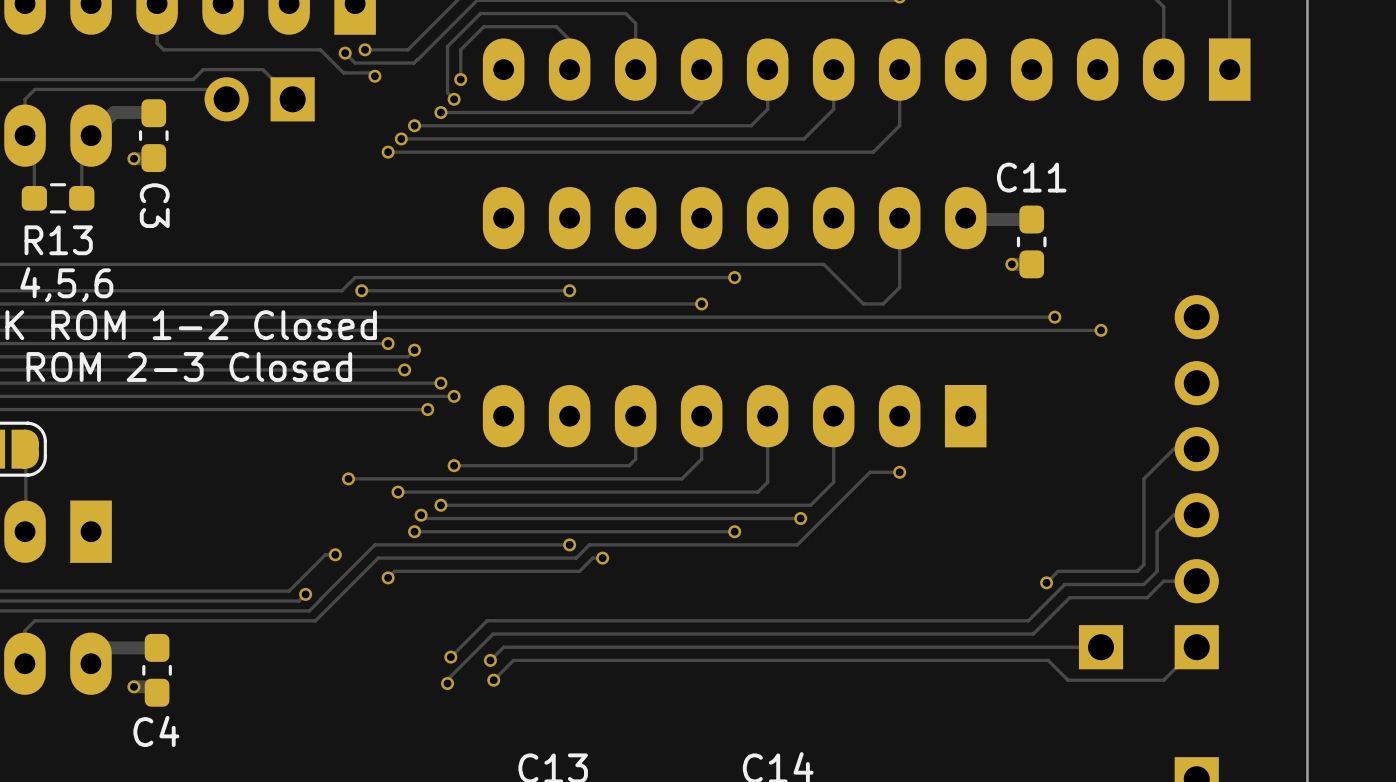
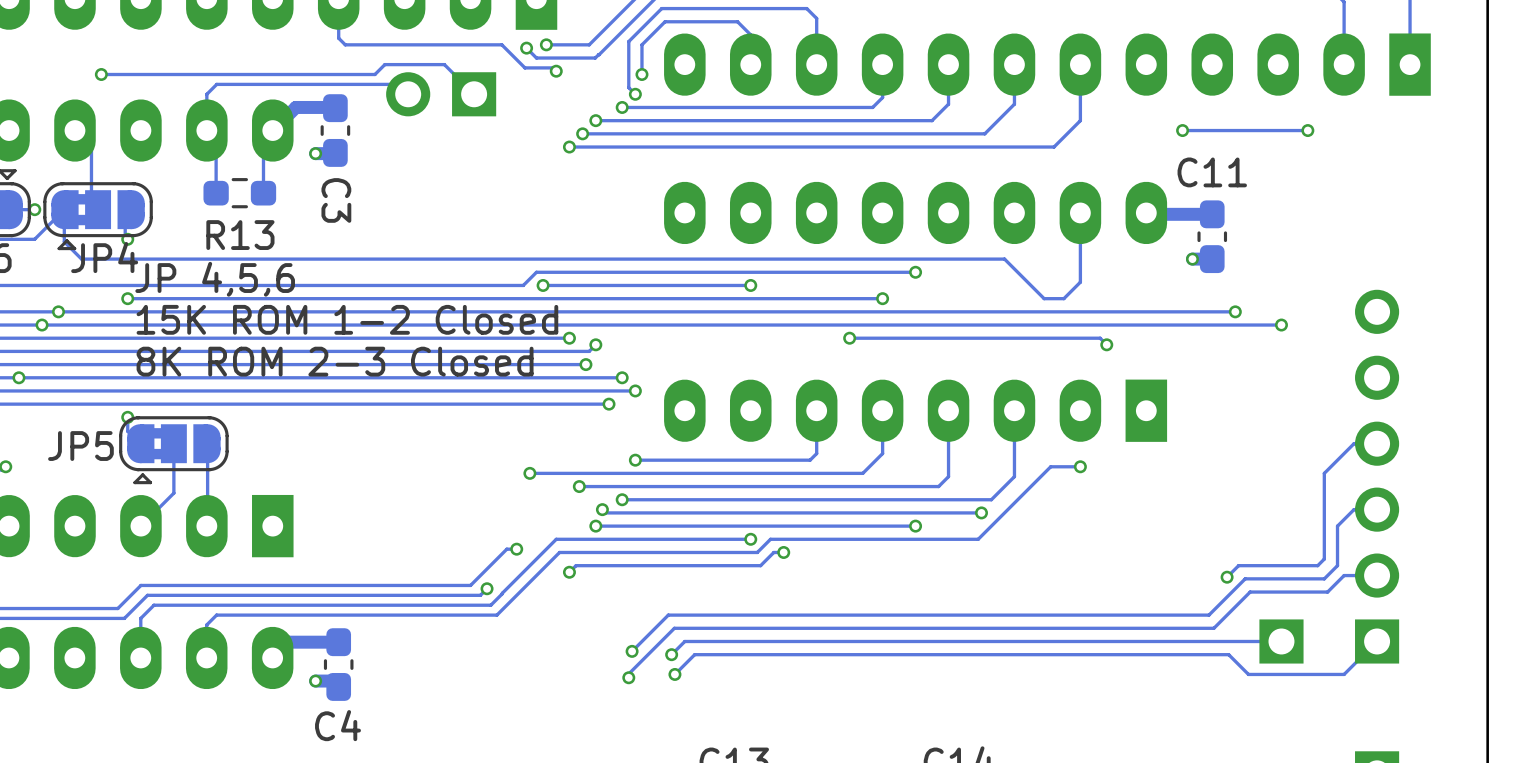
via: none -> (1182, 130)
track: none -> (1307, 130) (1182, 130)
via: none -> (1307, 130)
track: none -> (849, 338) (1100, 338) (1106, 344)
via: none -> (849, 338)
via: none -> (1106, 344)

